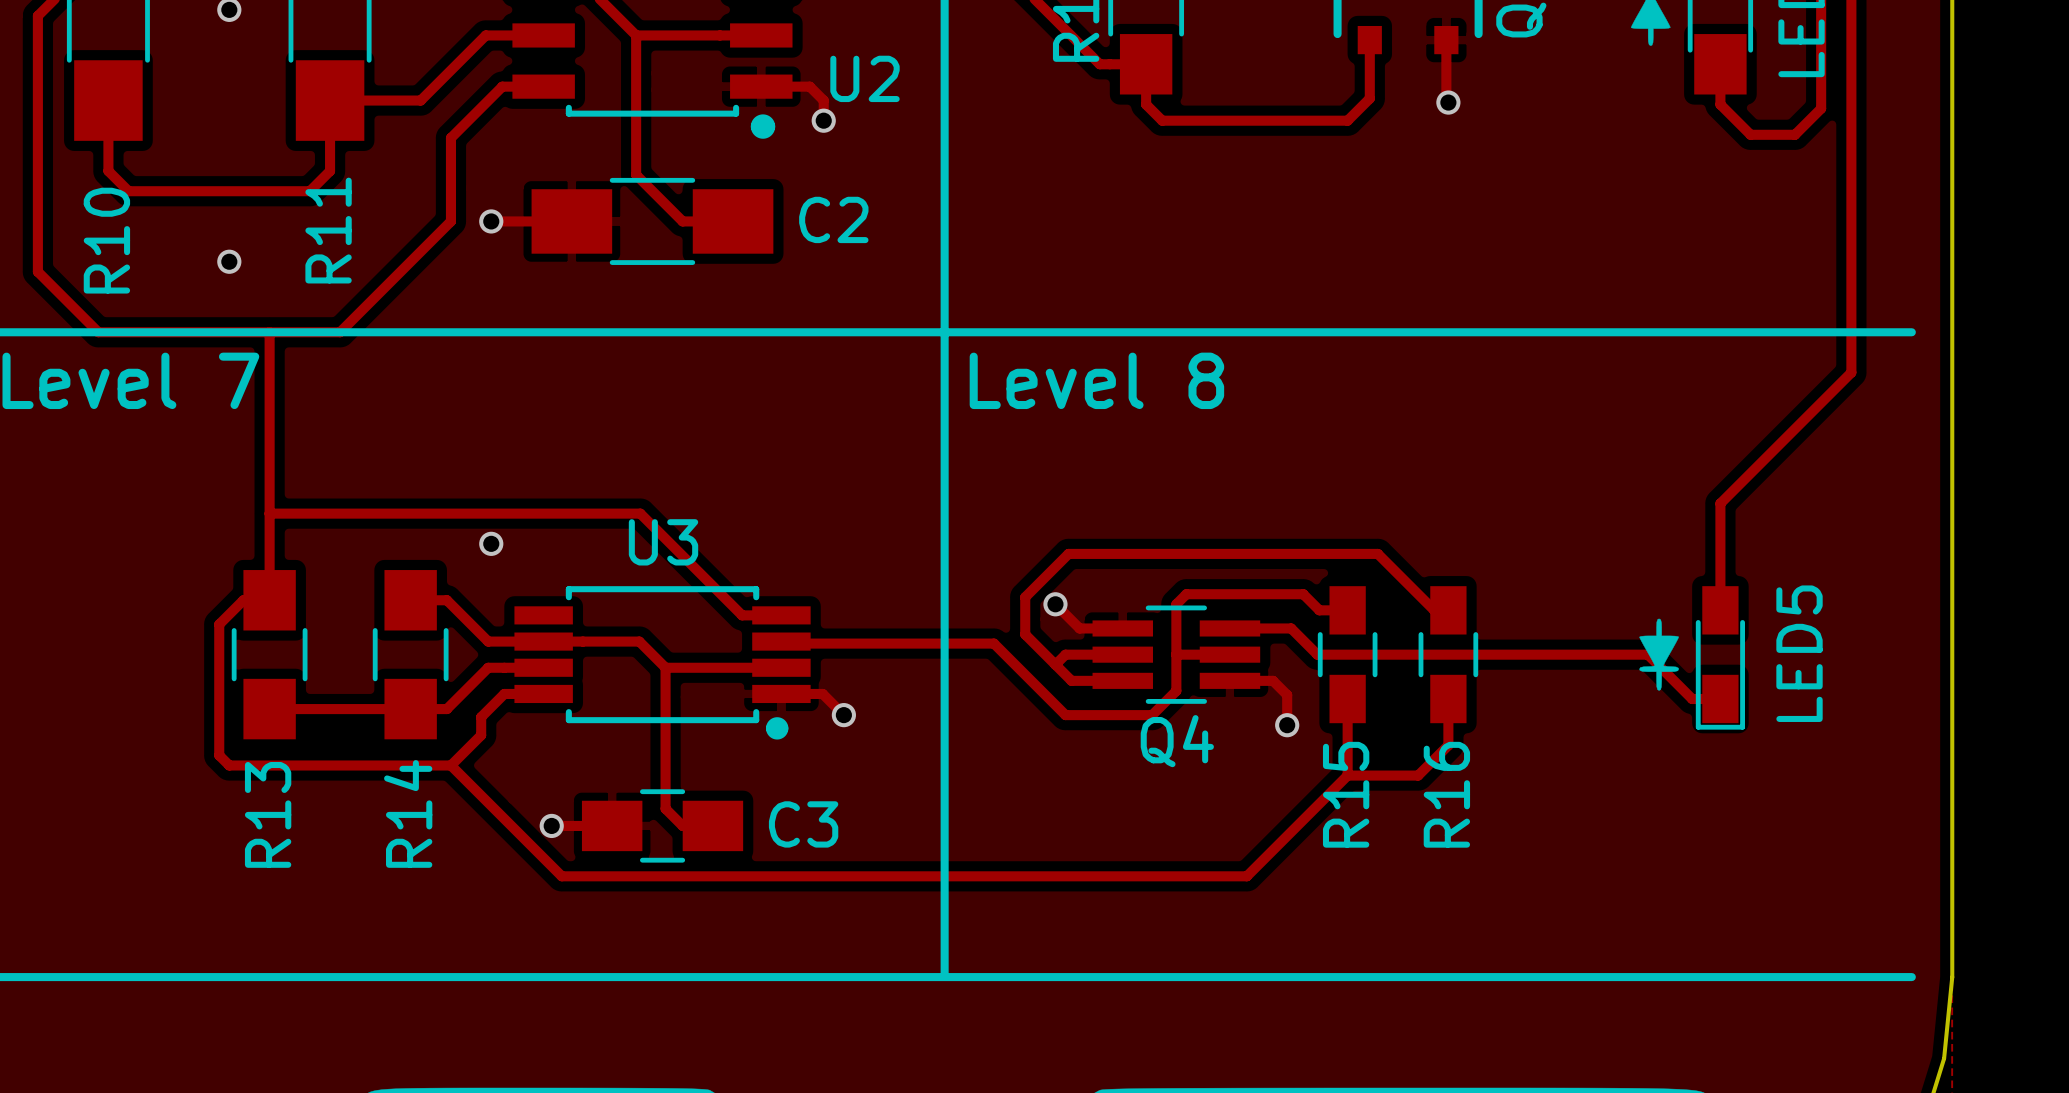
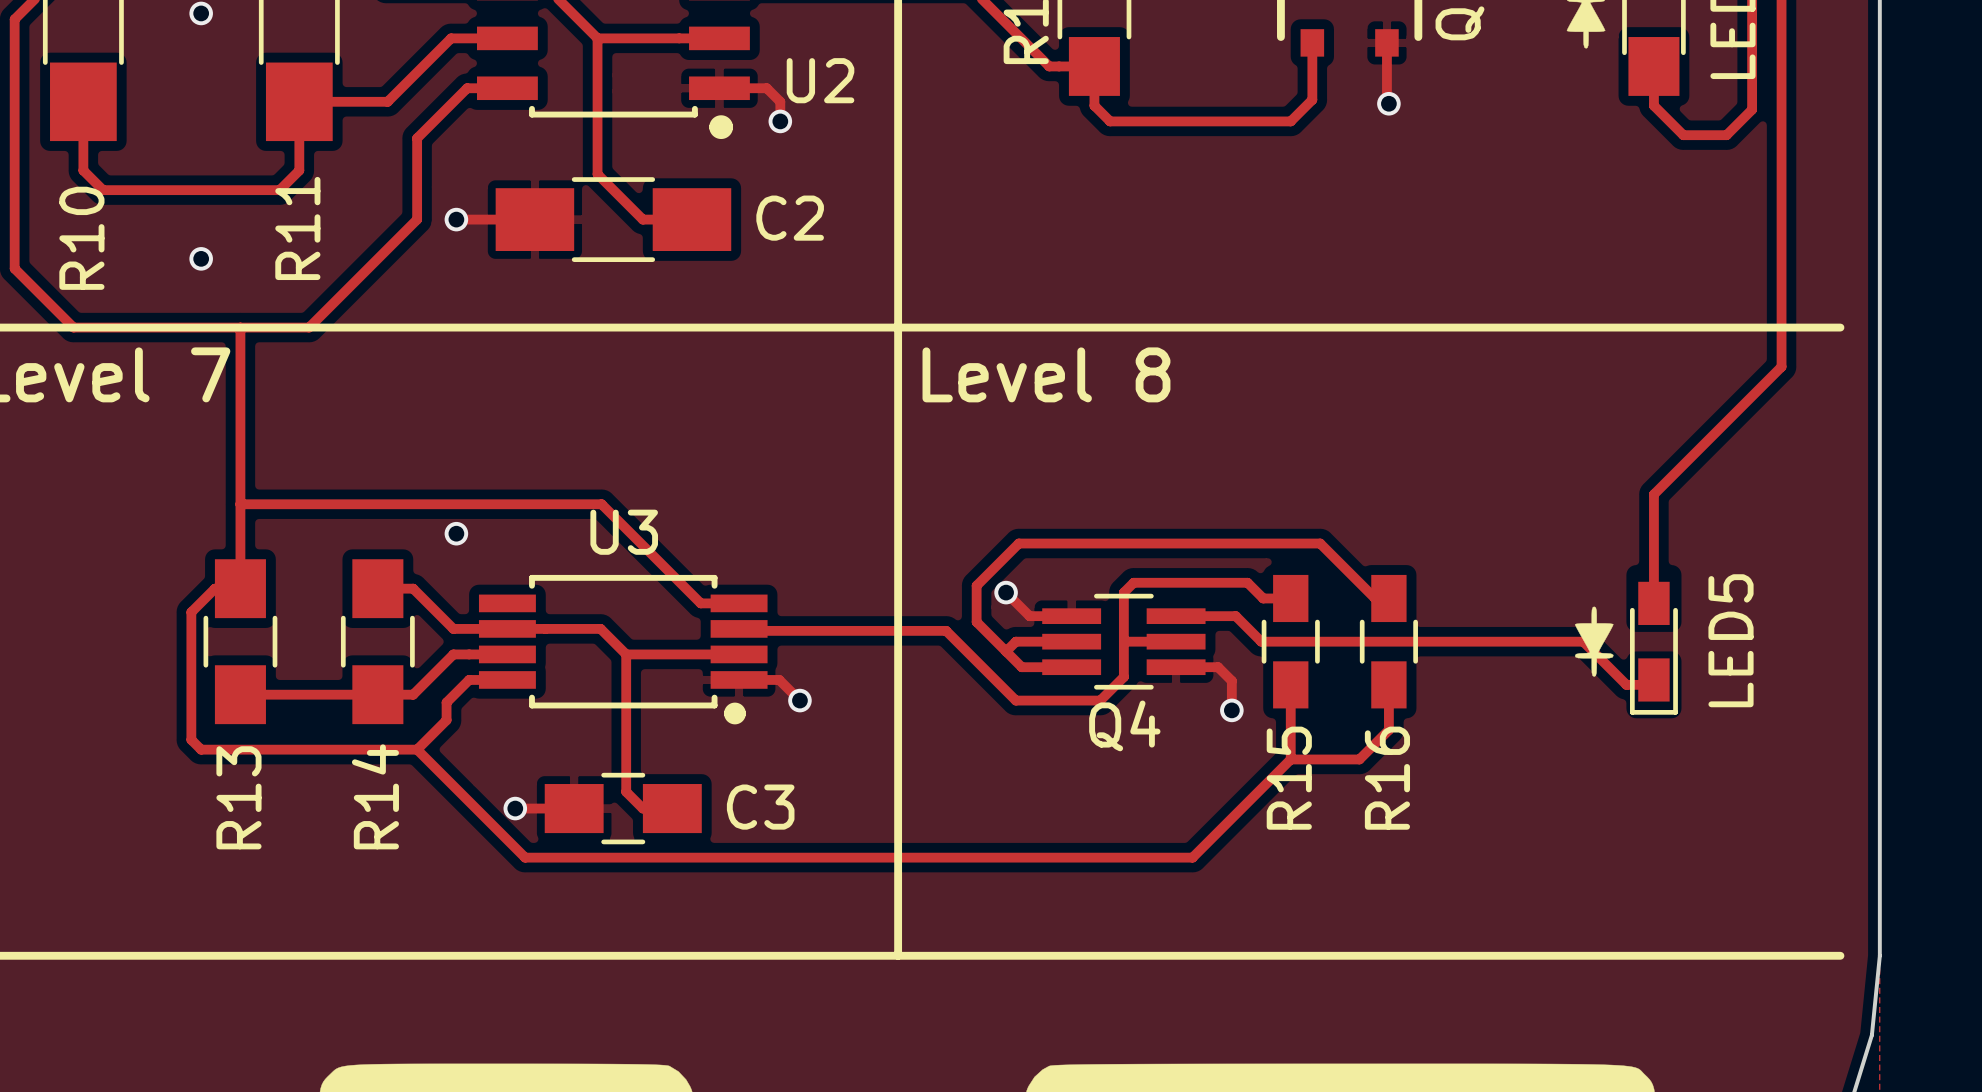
LED5 footprint: [1695, 586, 1745, 730] -> [1629, 581, 1678, 715]

